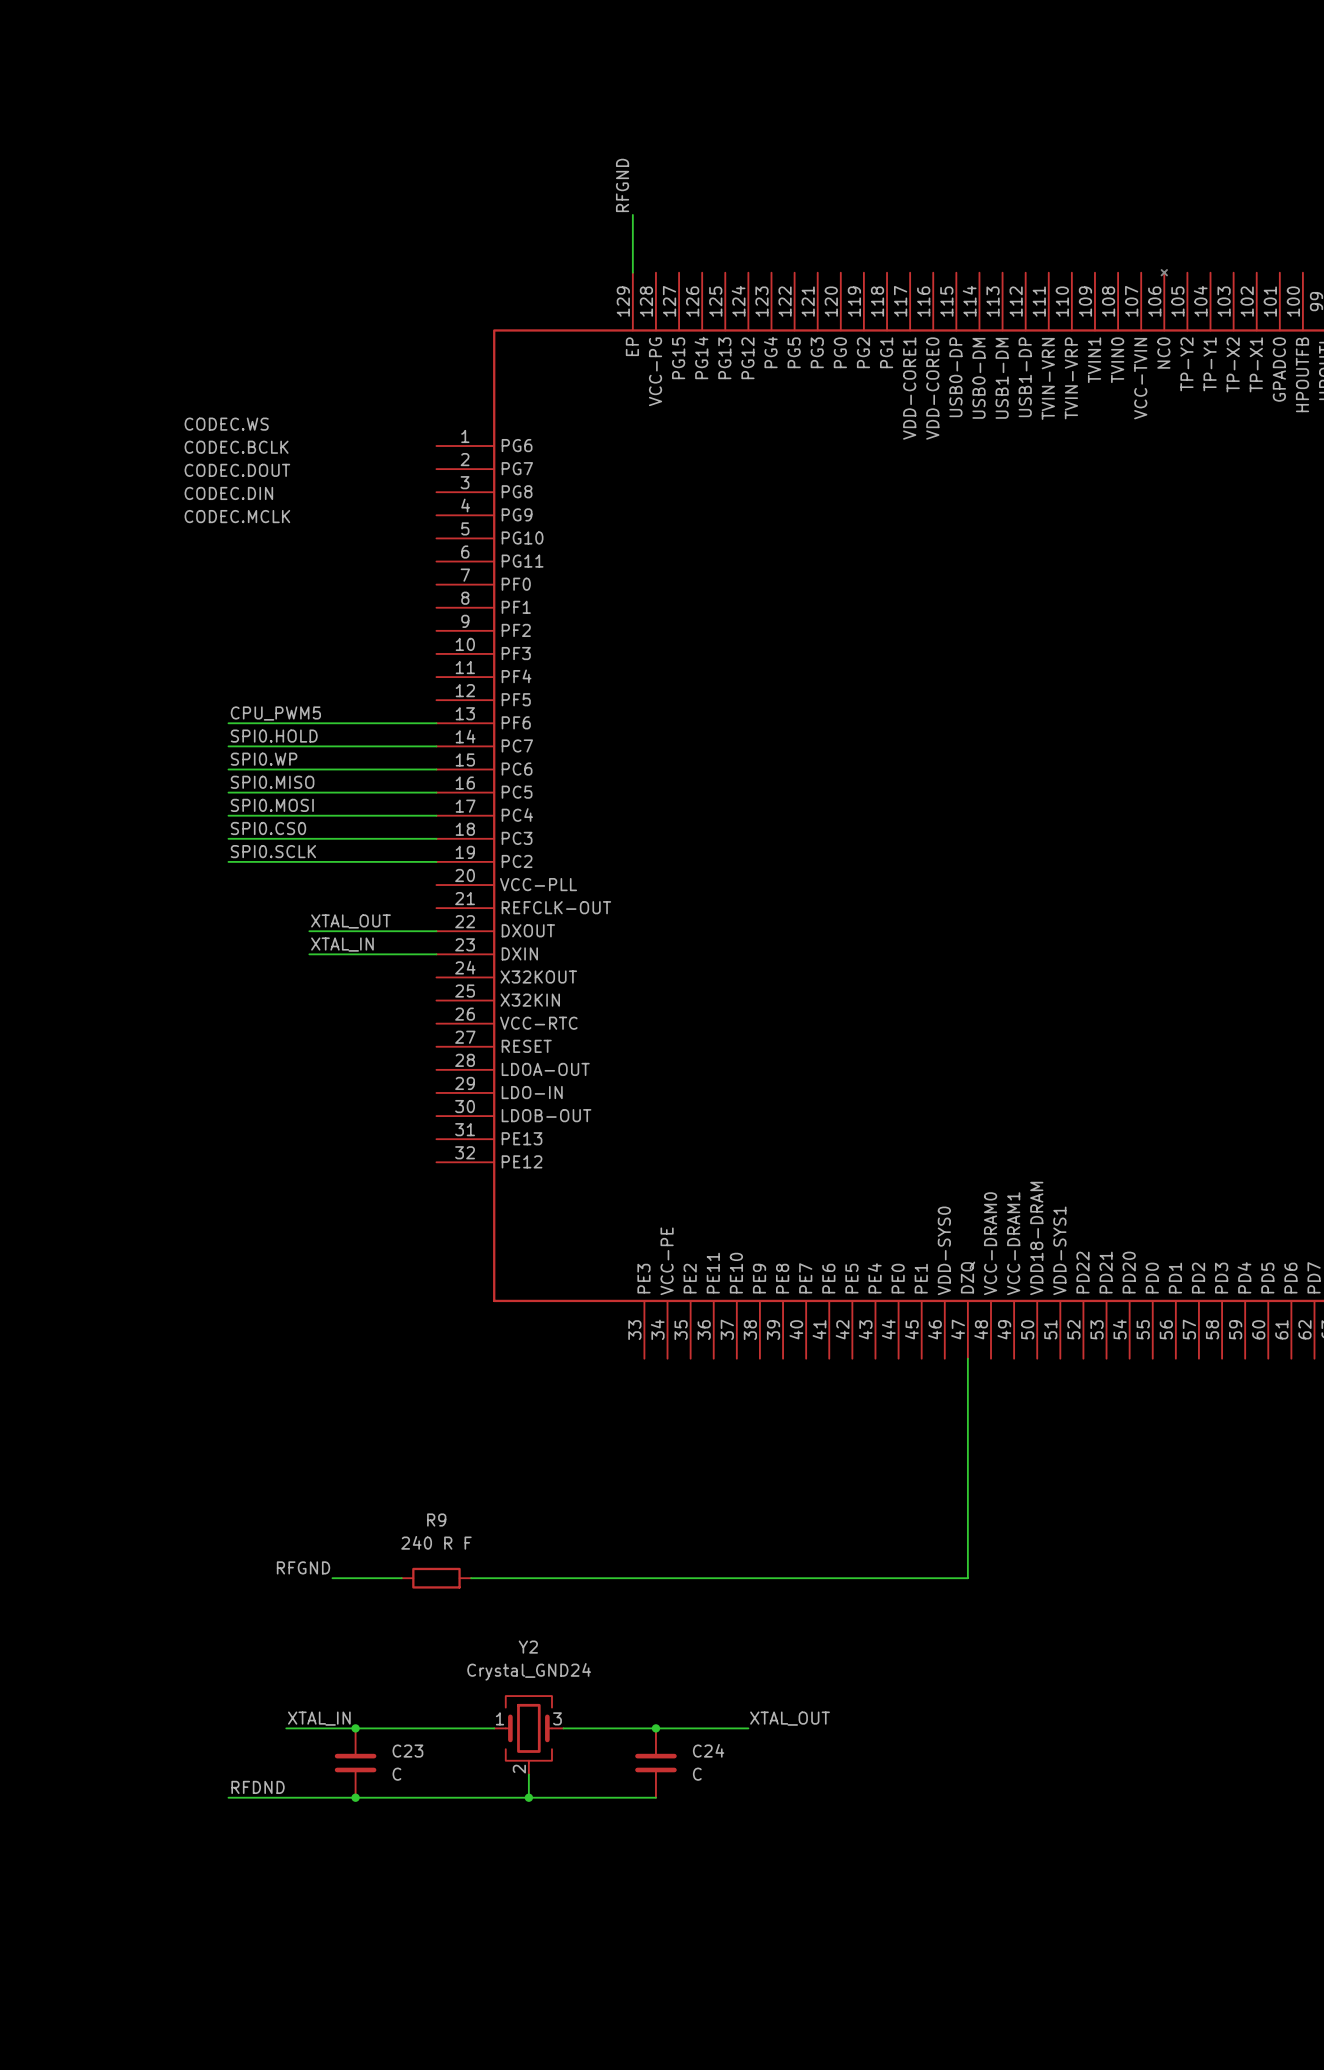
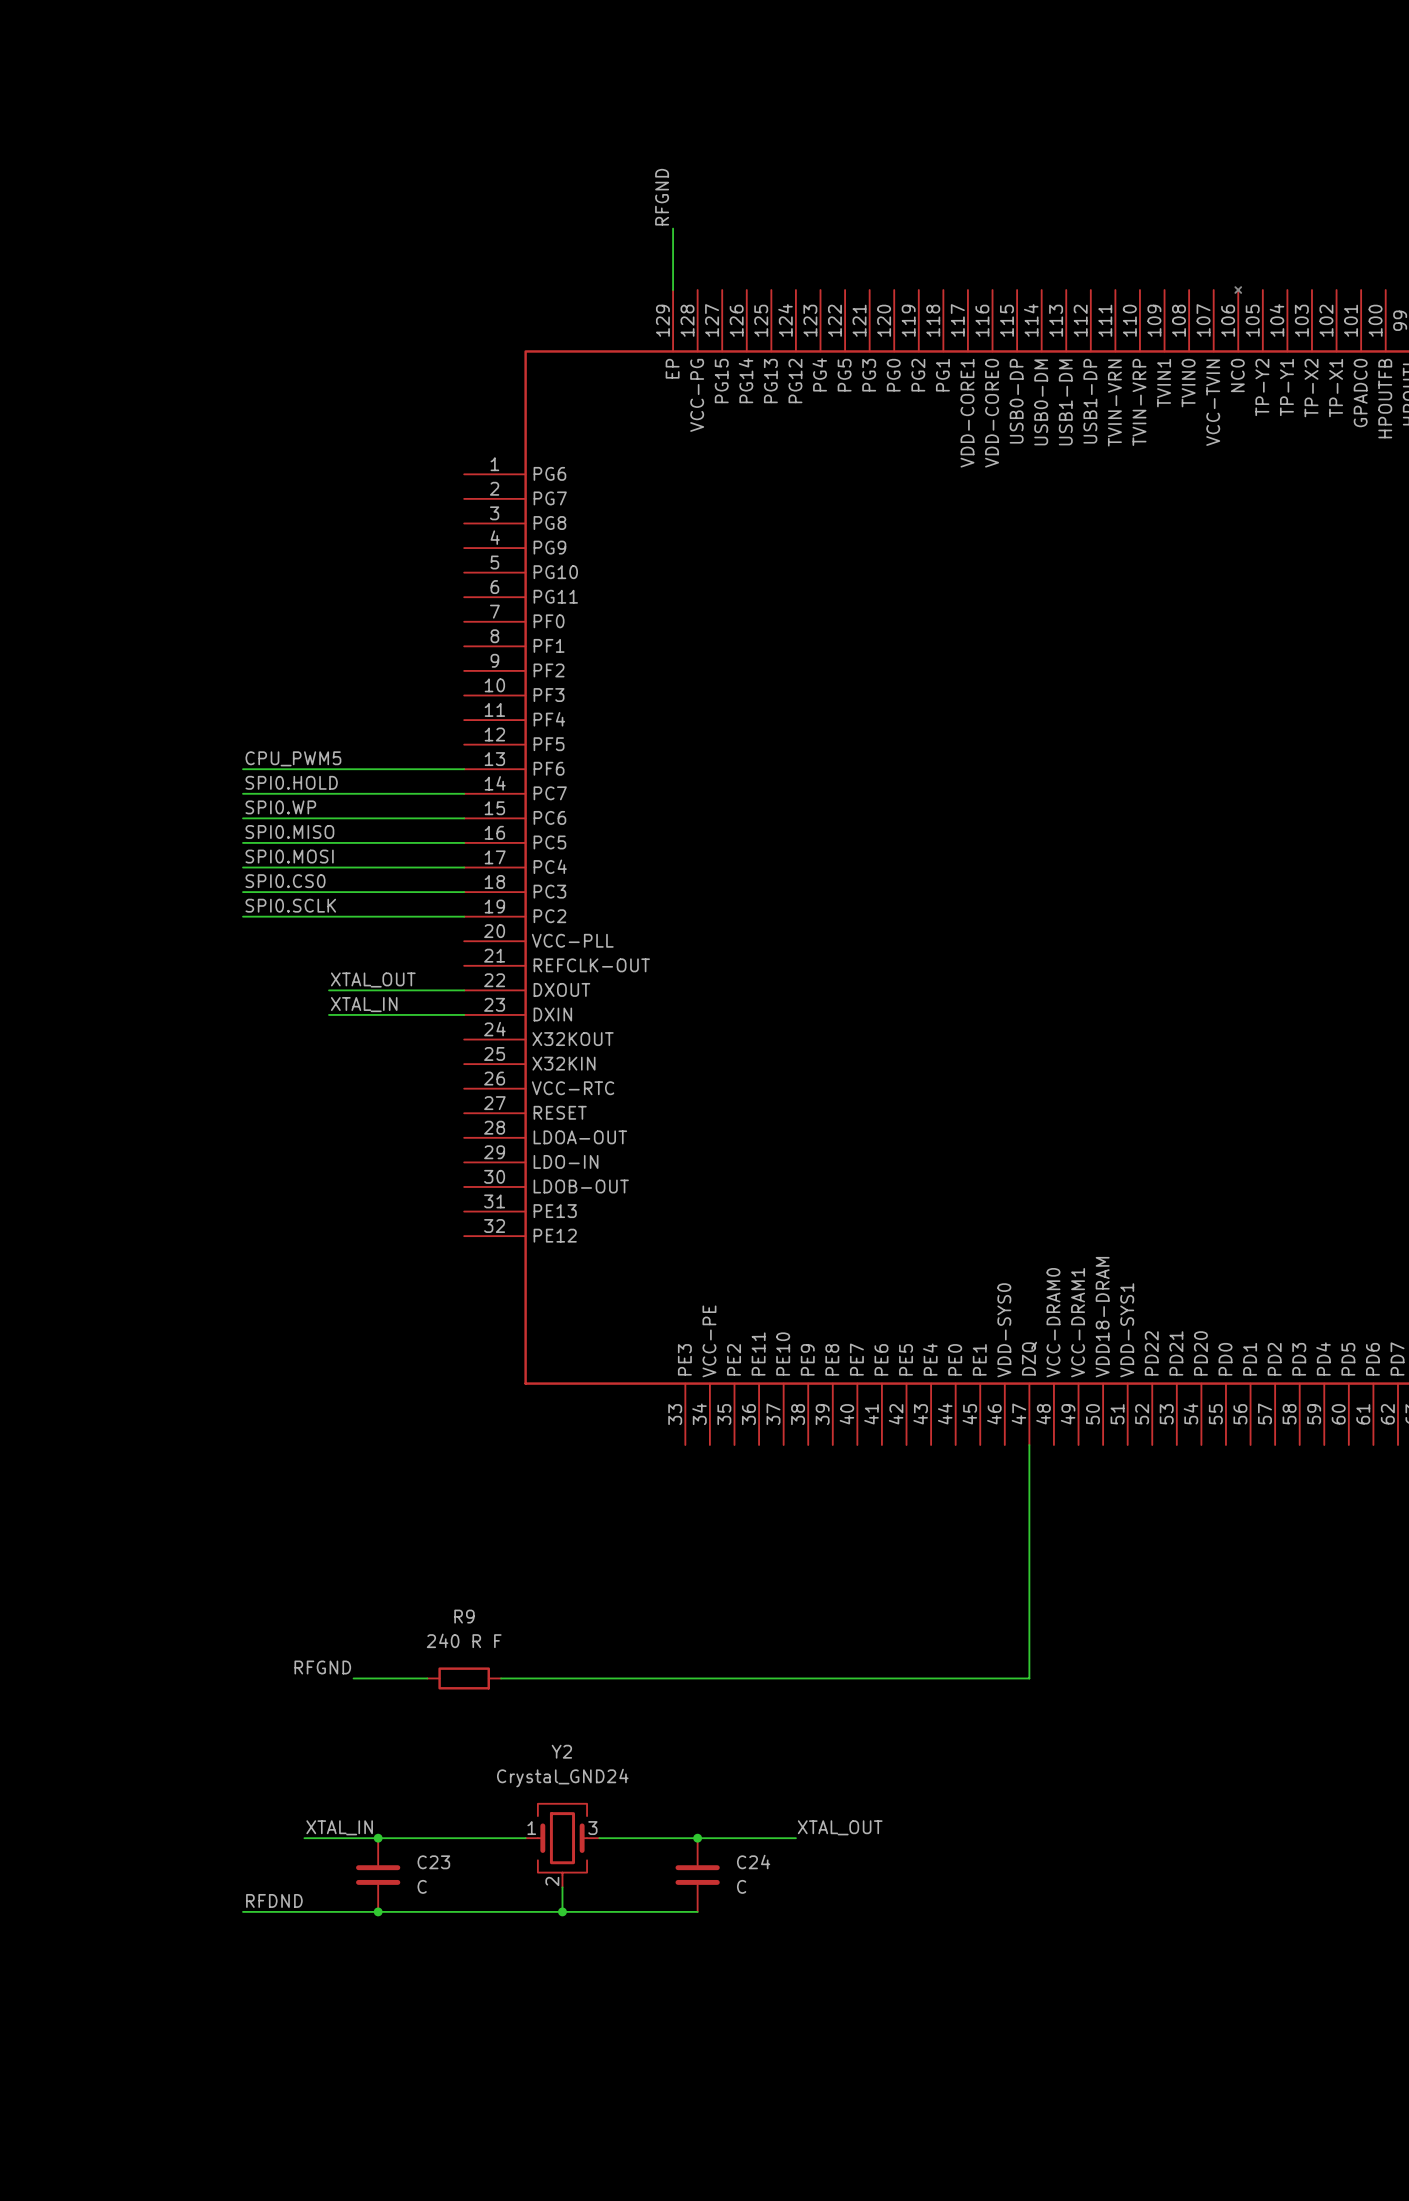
label: CODEC.WS (226, 424) -> none
label: CODEC.BCLK (236, 447) -> none
label: CODEC.DOUT (237, 470) -> none
label: CODEC.DIN (228, 493) -> none
label: CODEC.MCLK (237, 516) -> none

